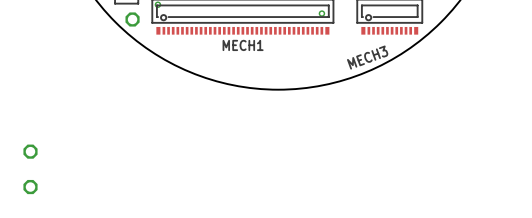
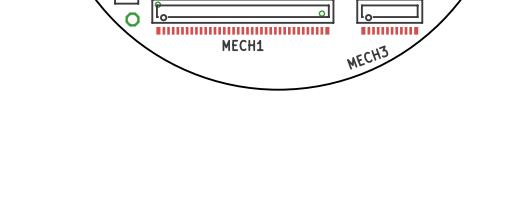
part: (30, 151) -> none
part: (30, 187) -> none

